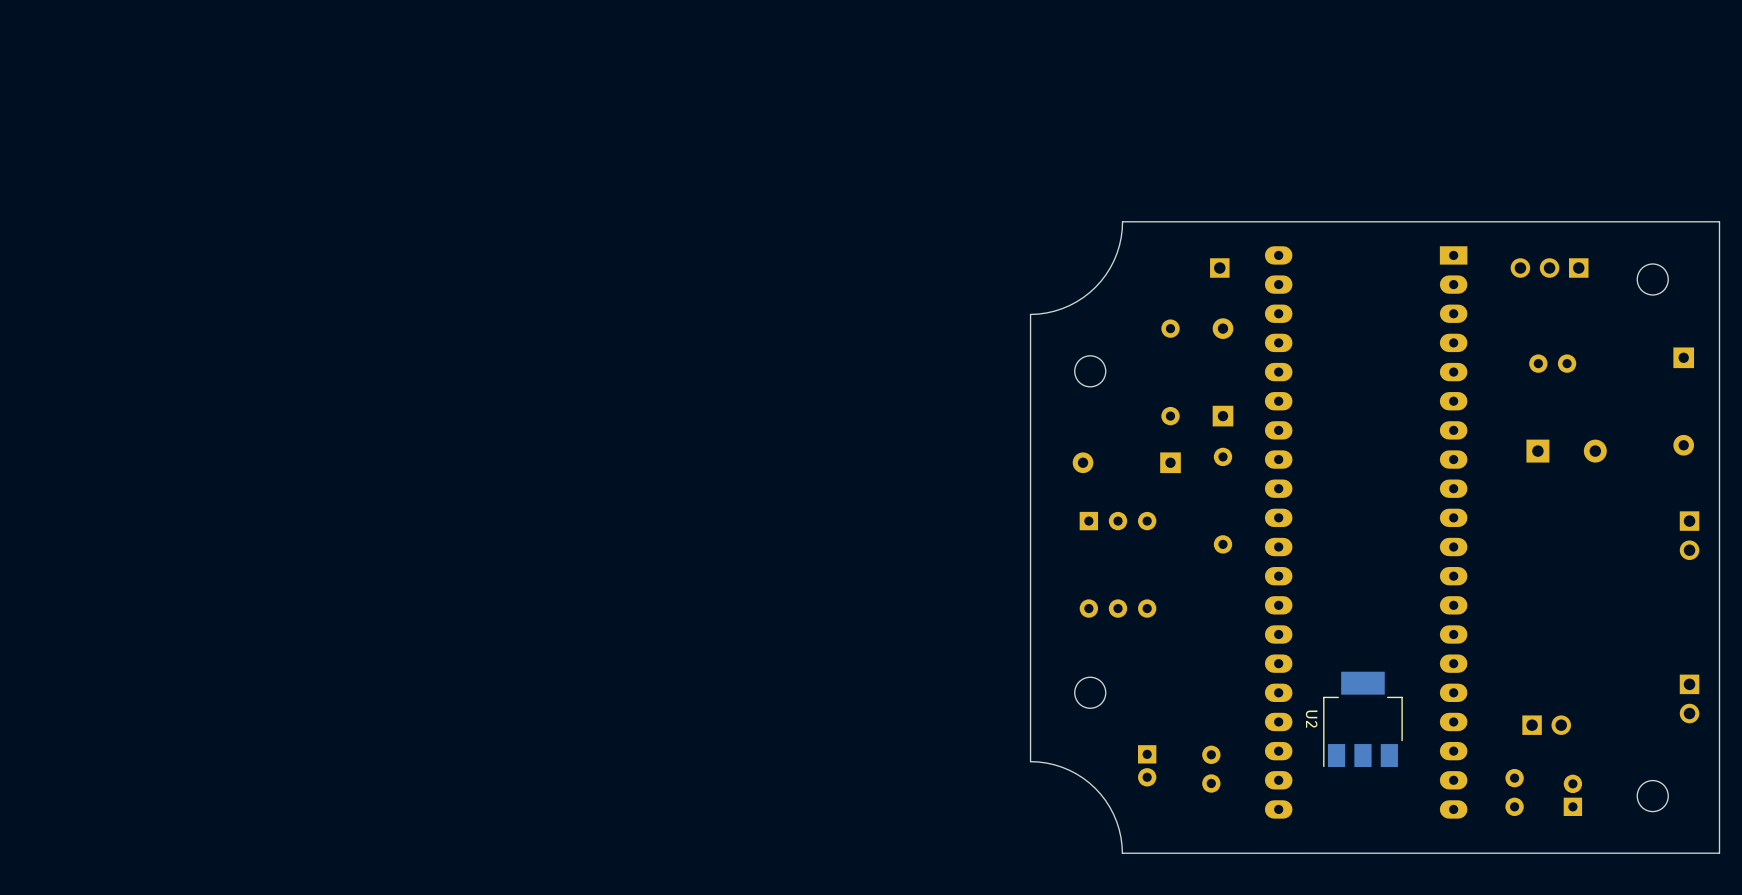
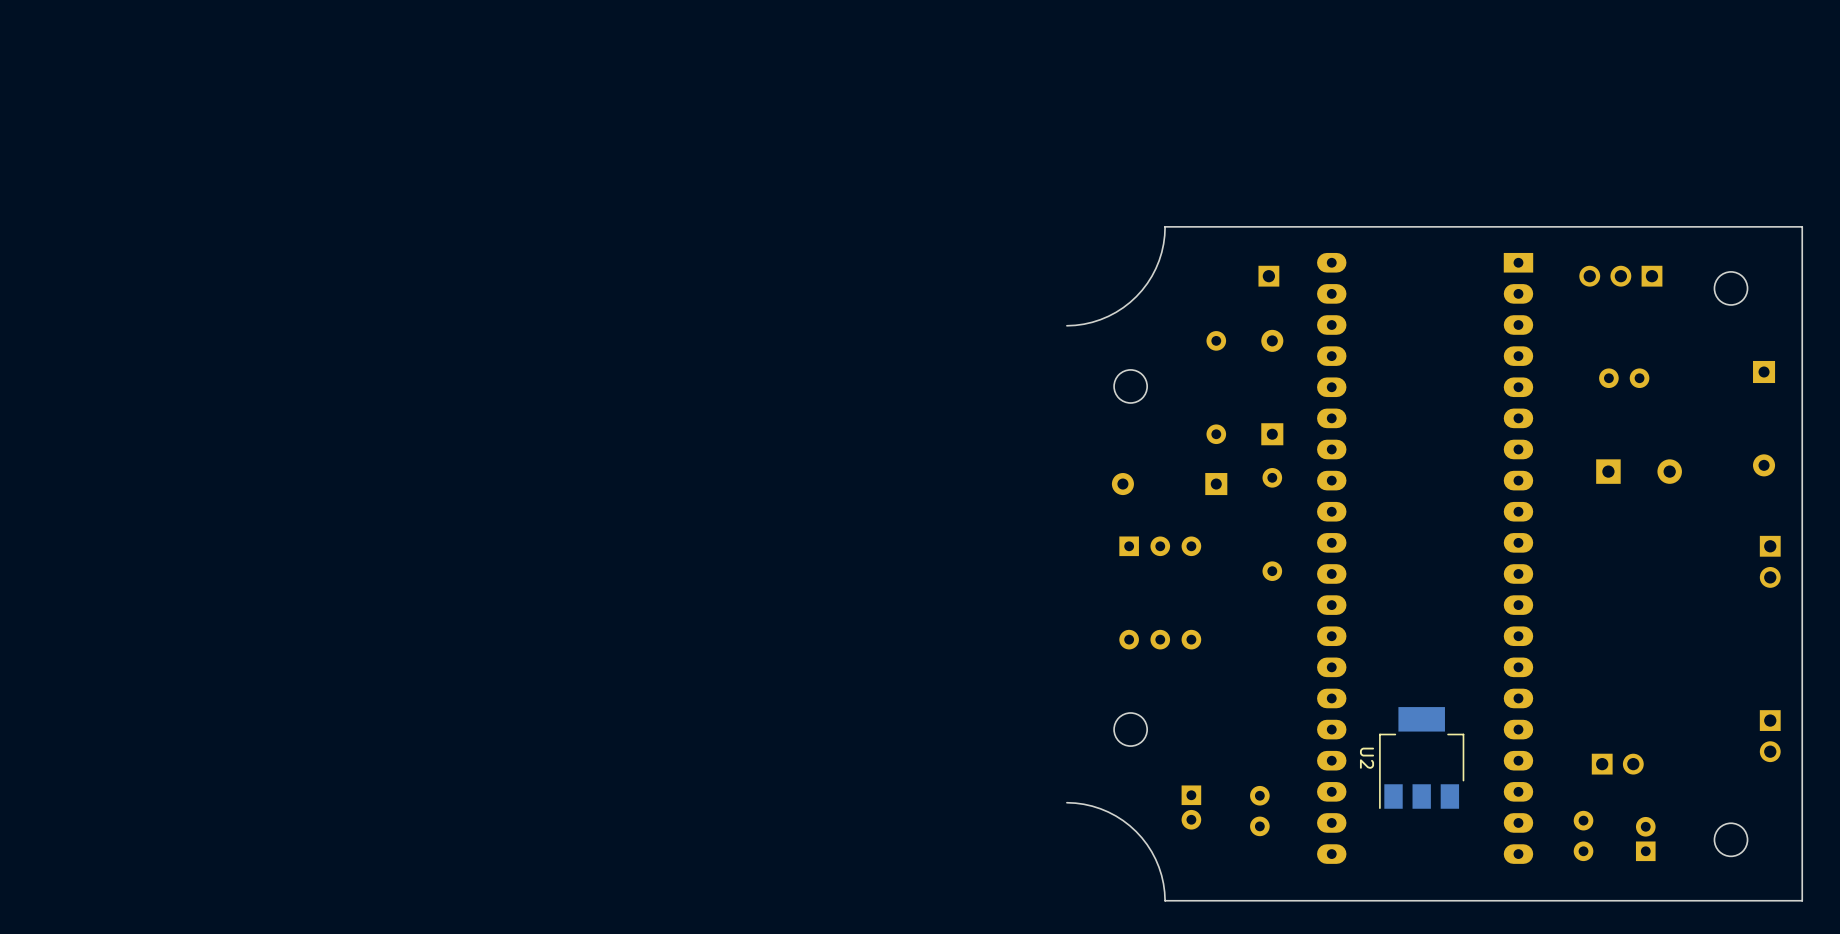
board edge: (1030, 314) (1030, 761) (1061, 767) (1083, 778) (1095, 788) (1105, 800) (1116, 821) (1122, 853) -> (1066, 802) (1092, 806) (1108, 812) (1136, 831) (1151, 851) (1159, 867) (1165, 900)

